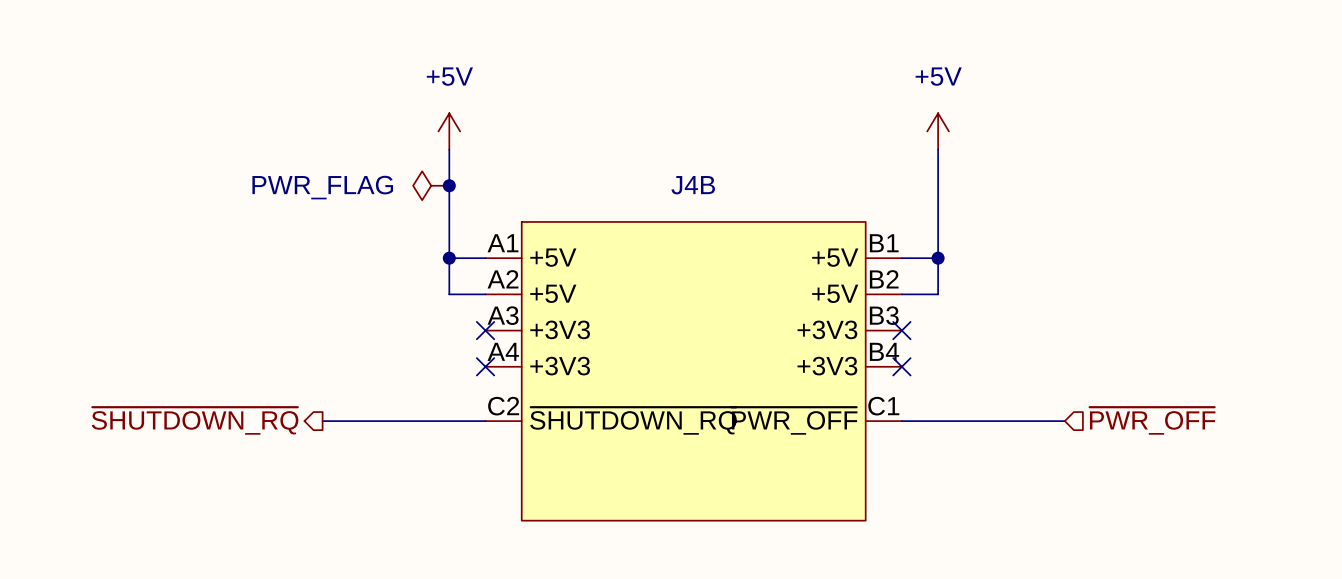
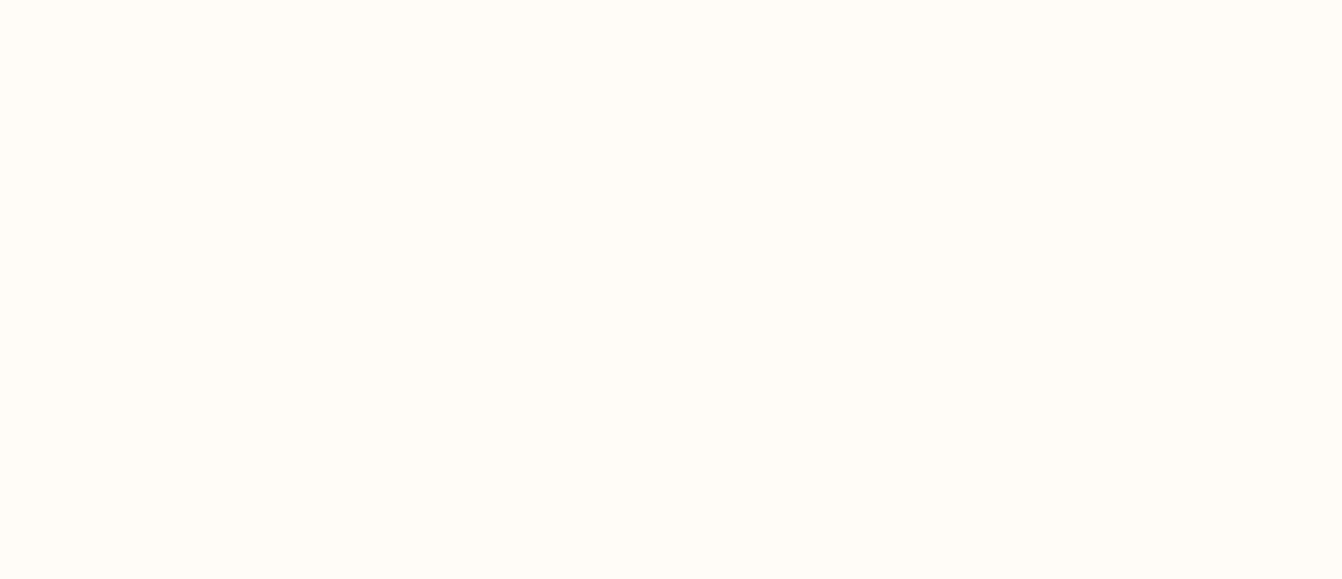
power symbol: +5V (449, 131) -> none
power symbol: +5V (938, 131) -> none
wire: (449, 149) (449, 294) (485, 294) -> none
wire: (938, 149) (938, 294) (901, 294) -> none
power symbol: PWR_FLAG (431, 185) -> none
junction: (449, 185) -> none
wire: (449, 258) (485, 258) -> none
junction: (449, 258) -> none
wire: (901, 258) (938, 258) -> none
junction: (938, 258) -> none
no-connect mark: (485, 330) -> none
no-connect mark: (901, 330) -> none
no-connect mark: (485, 366) -> none
no-connect mark: (901, 366) -> none
J4B: (693, 371) -> none
hierarchical label: ~{SHUTDOWN_RQ} (195, 420) -> none
hierarchical label: ~{PWR_OFF} (1152, 420) -> none
wire: (322, 421) (485, 421) -> none
wire: (901, 421) (1064, 421) -> none

